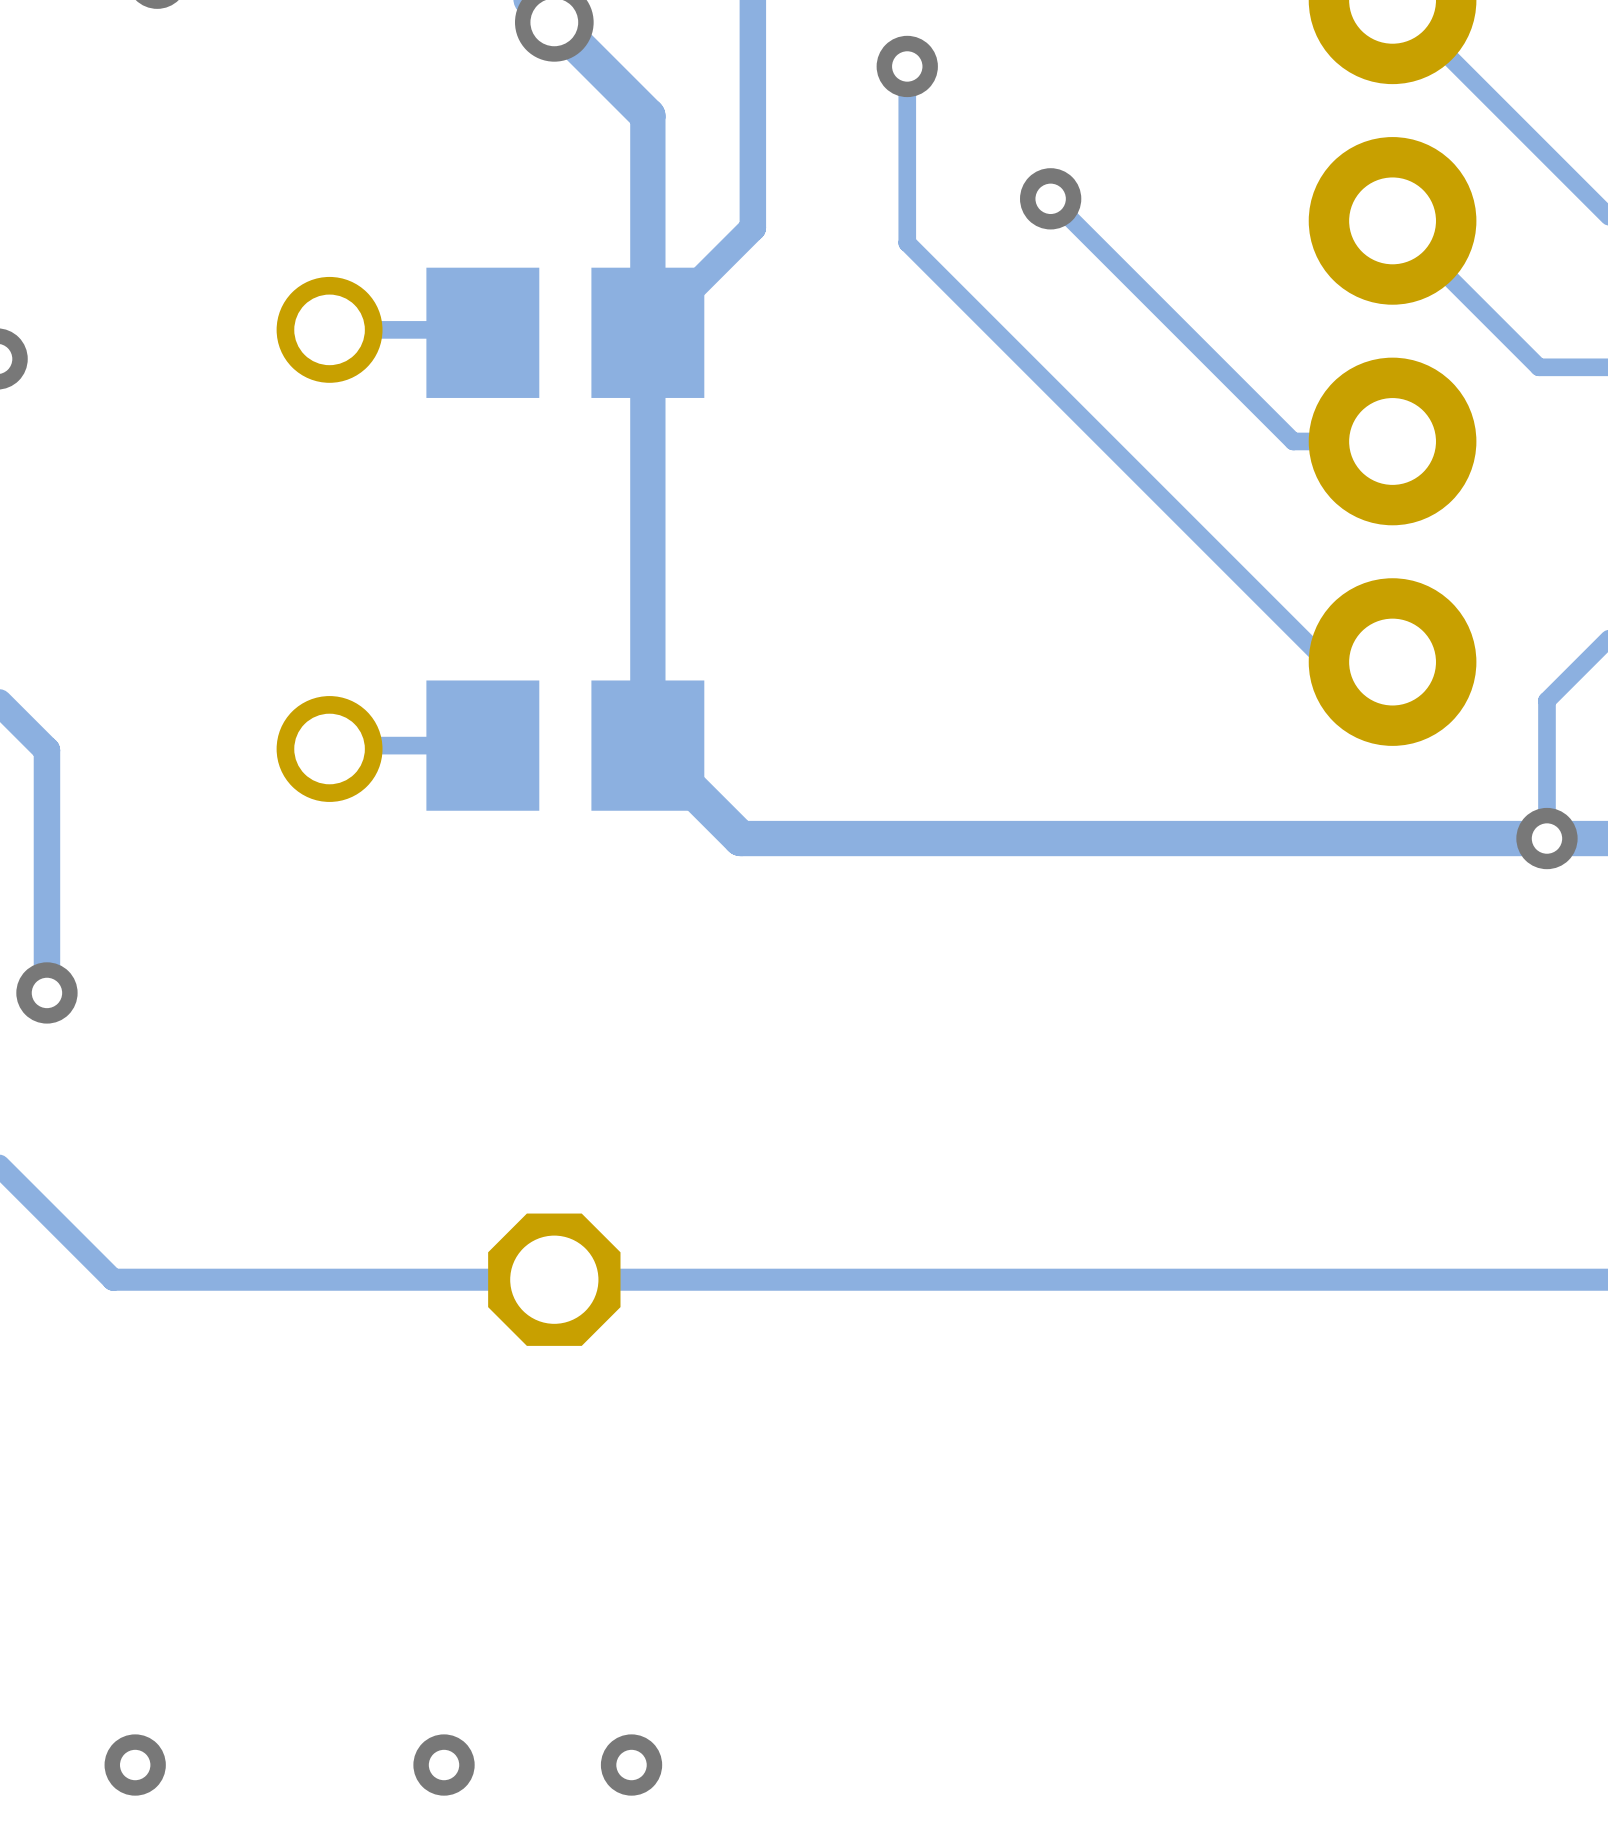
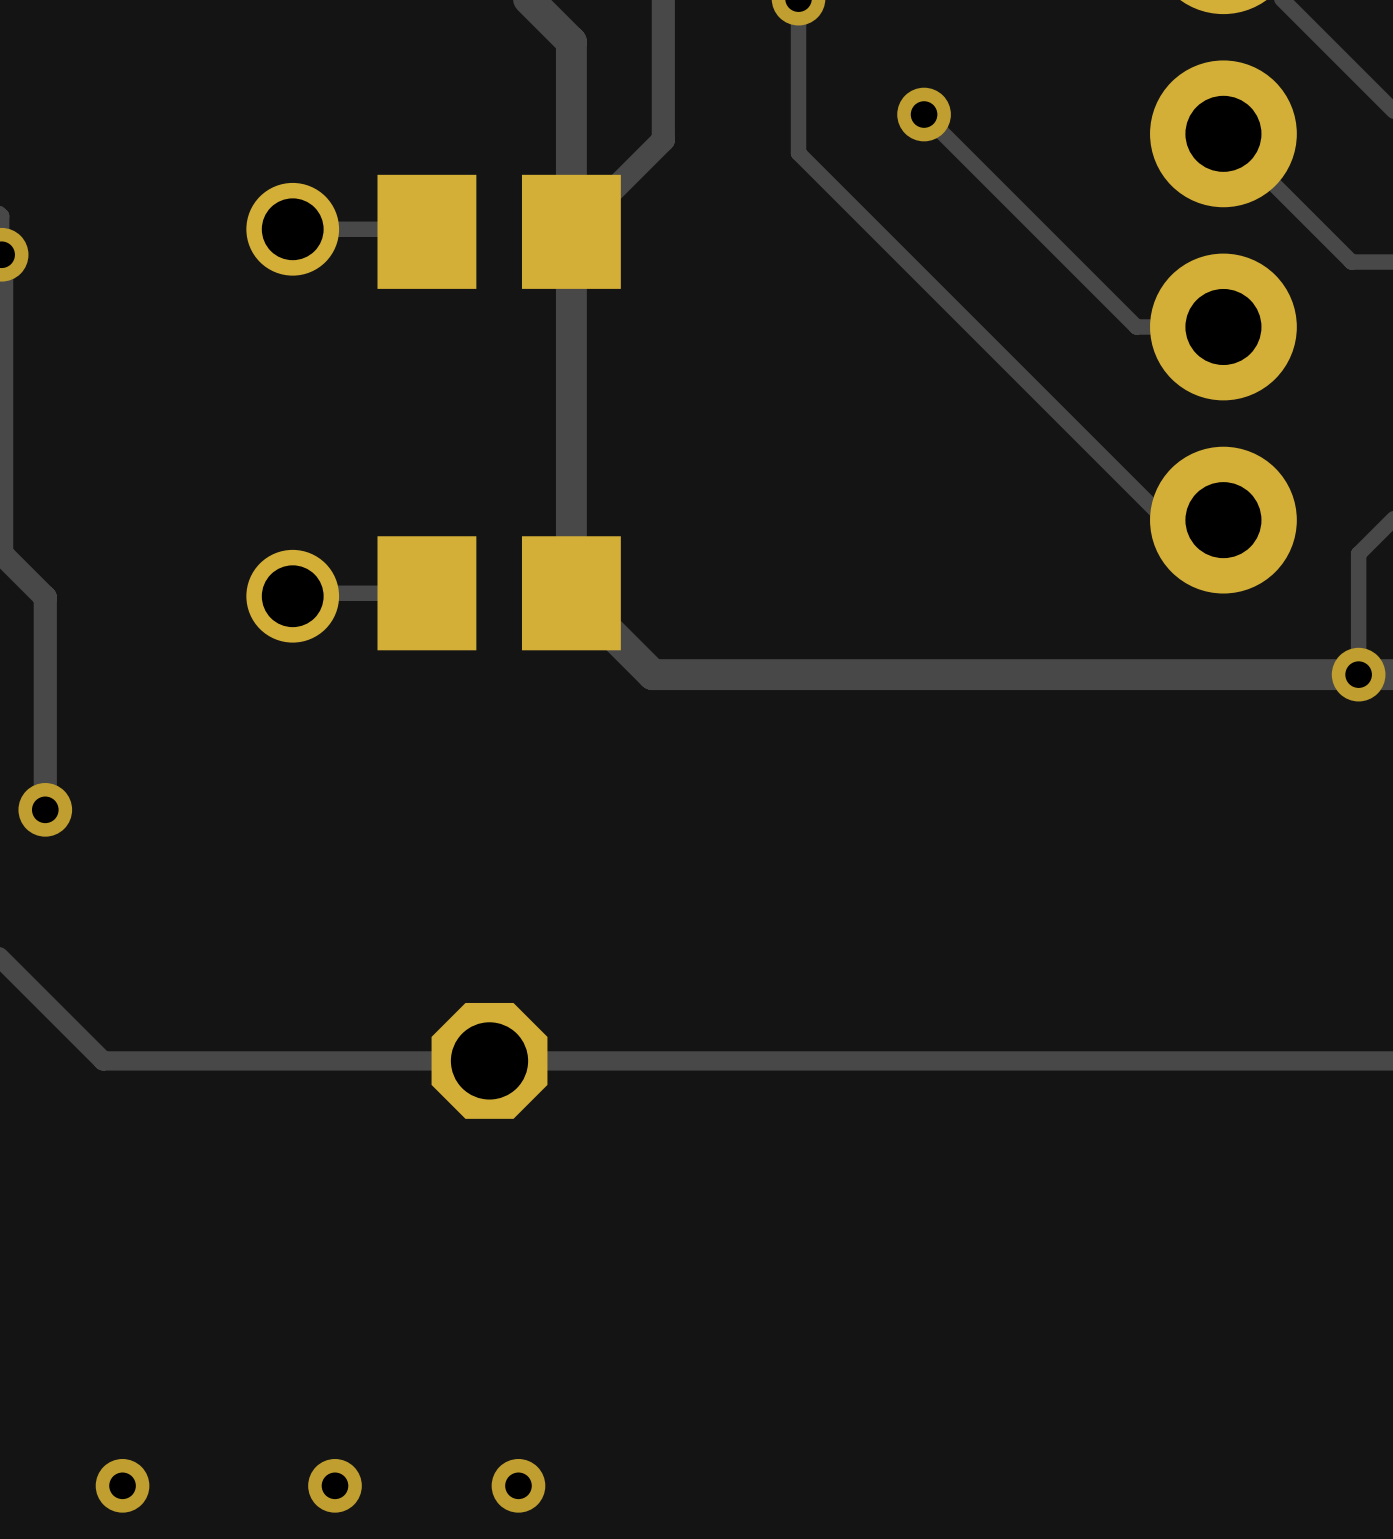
via position: (444, 1765) -> (334, 1485)
via position: (631, 1765) -> (518, 1485)

